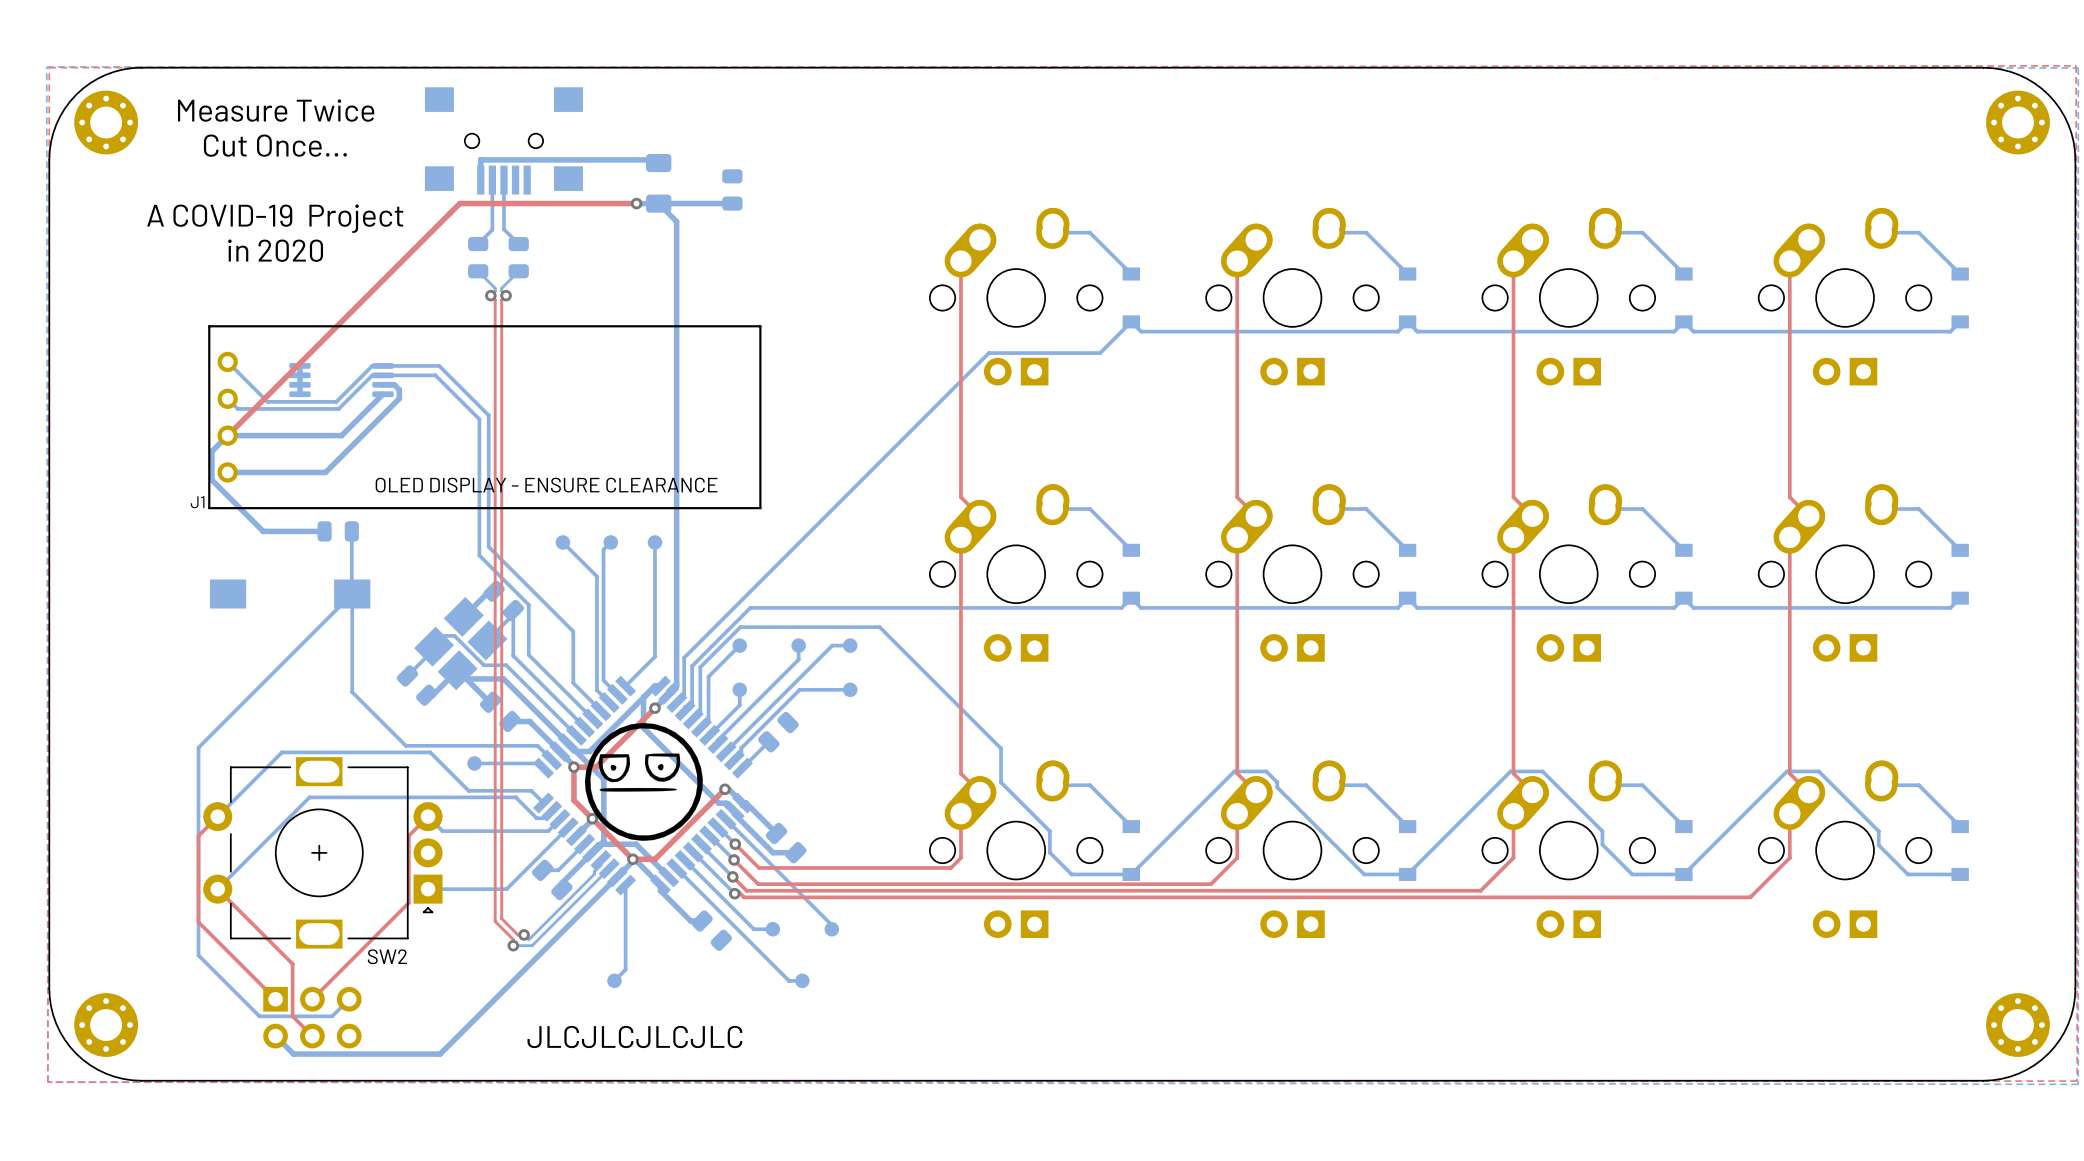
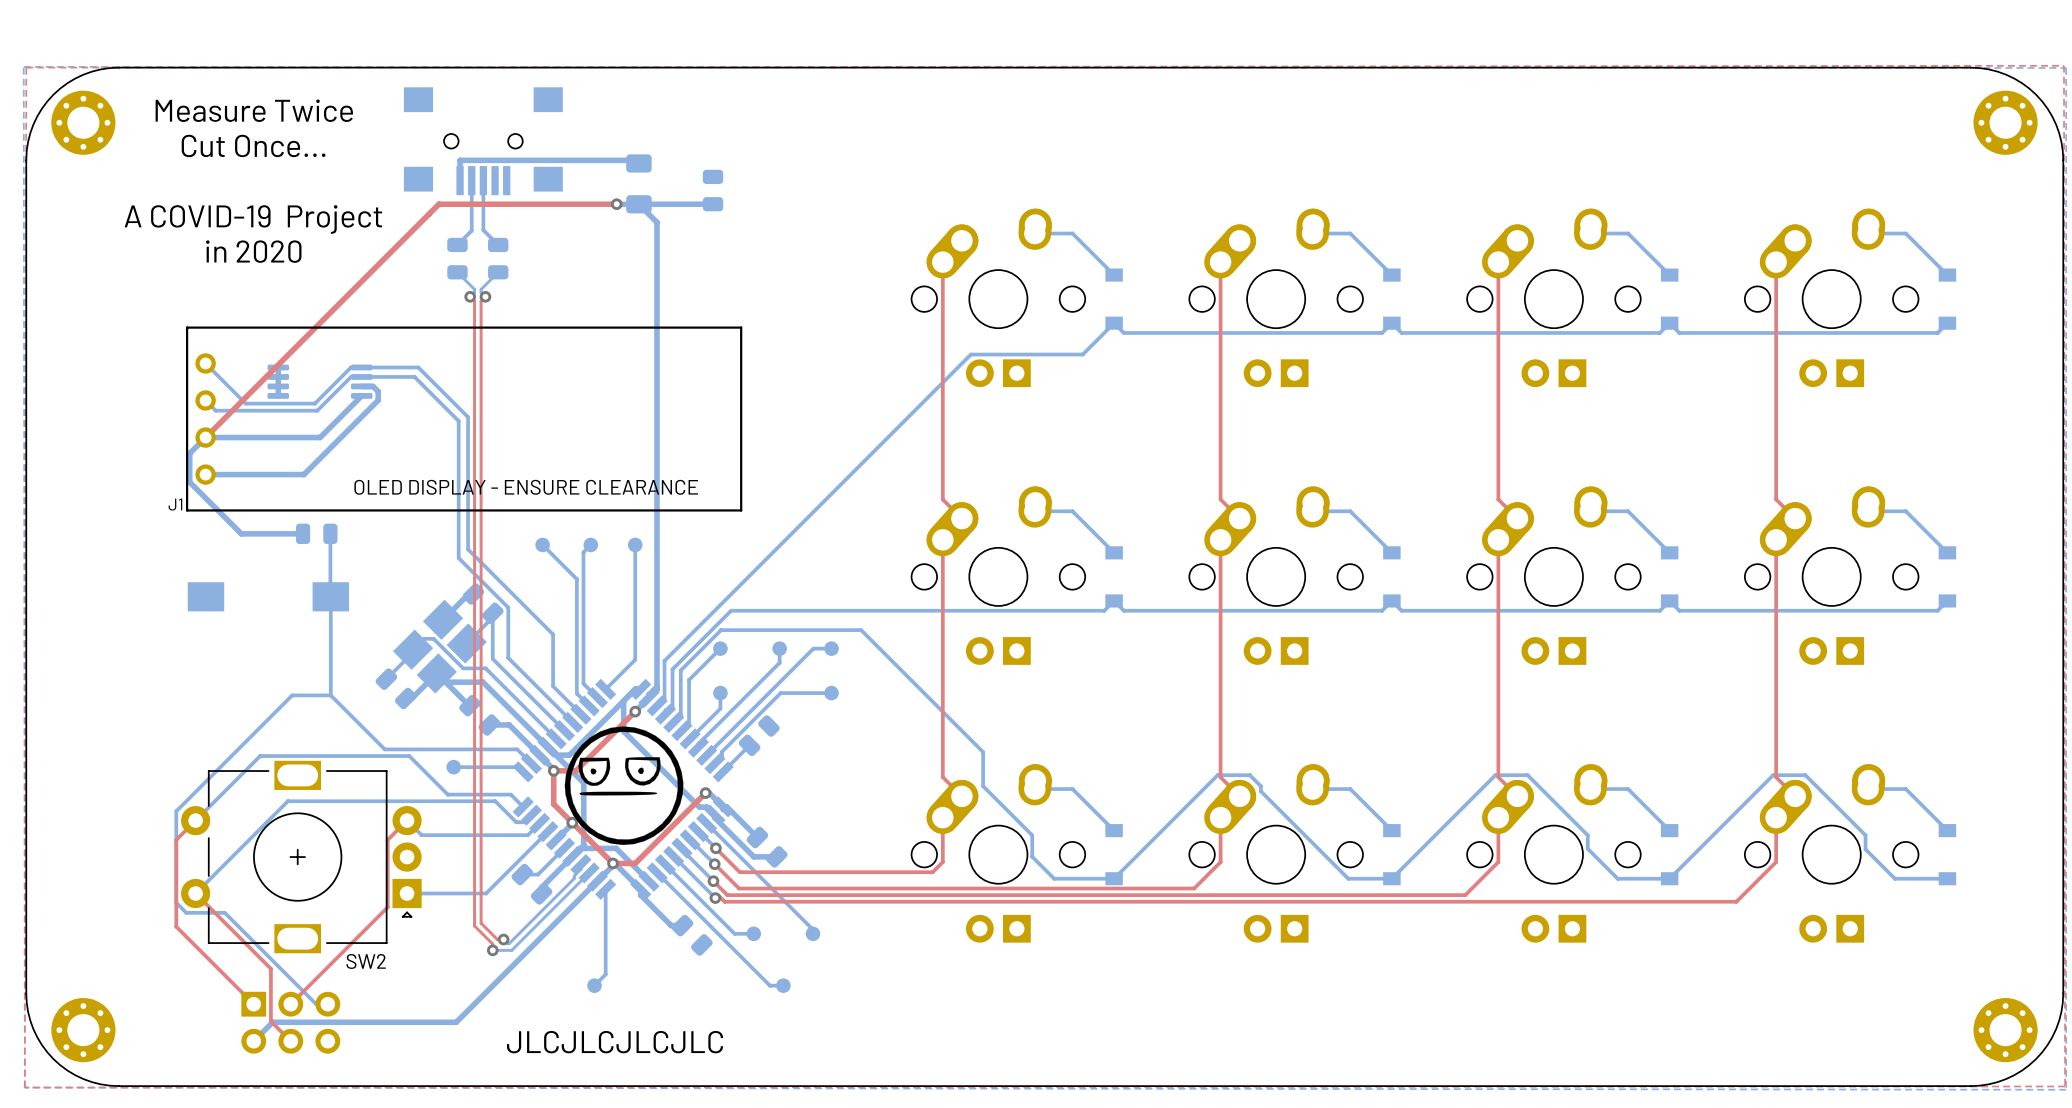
bottom track: (352, 594) (198, 747) (198, 807) -> (330, 695) (292, 695) (176, 811)
bottom track: (198, 898) (198, 955) (259, 1016) (332, 1016) (349, 999) -> (176, 902) (186, 912) (224, 912) (316, 1004) (327, 1004)
bottom track: (477, 1017) (440, 1054) (293, 1054) (275, 1036) -> (456, 1022) (272, 1022) (253, 1041)

